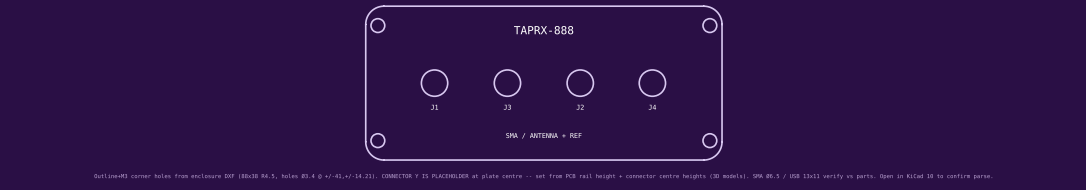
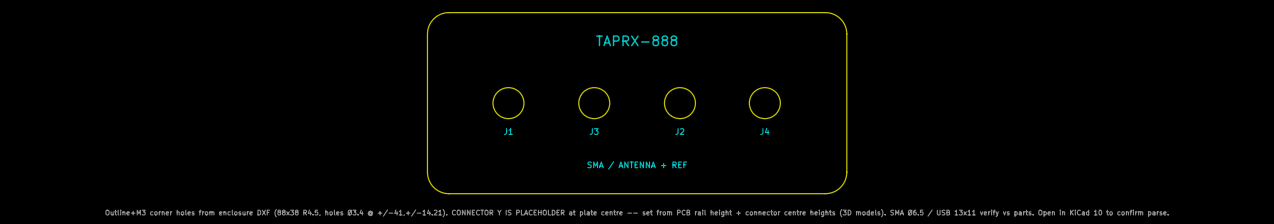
round board edge: [370, 18, 385, 33] -> none
round board edge: [702, 18, 717, 33] -> none
round board edge: [370, 133, 385, 148] -> none
round board edge: [702, 133, 717, 148] -> none

